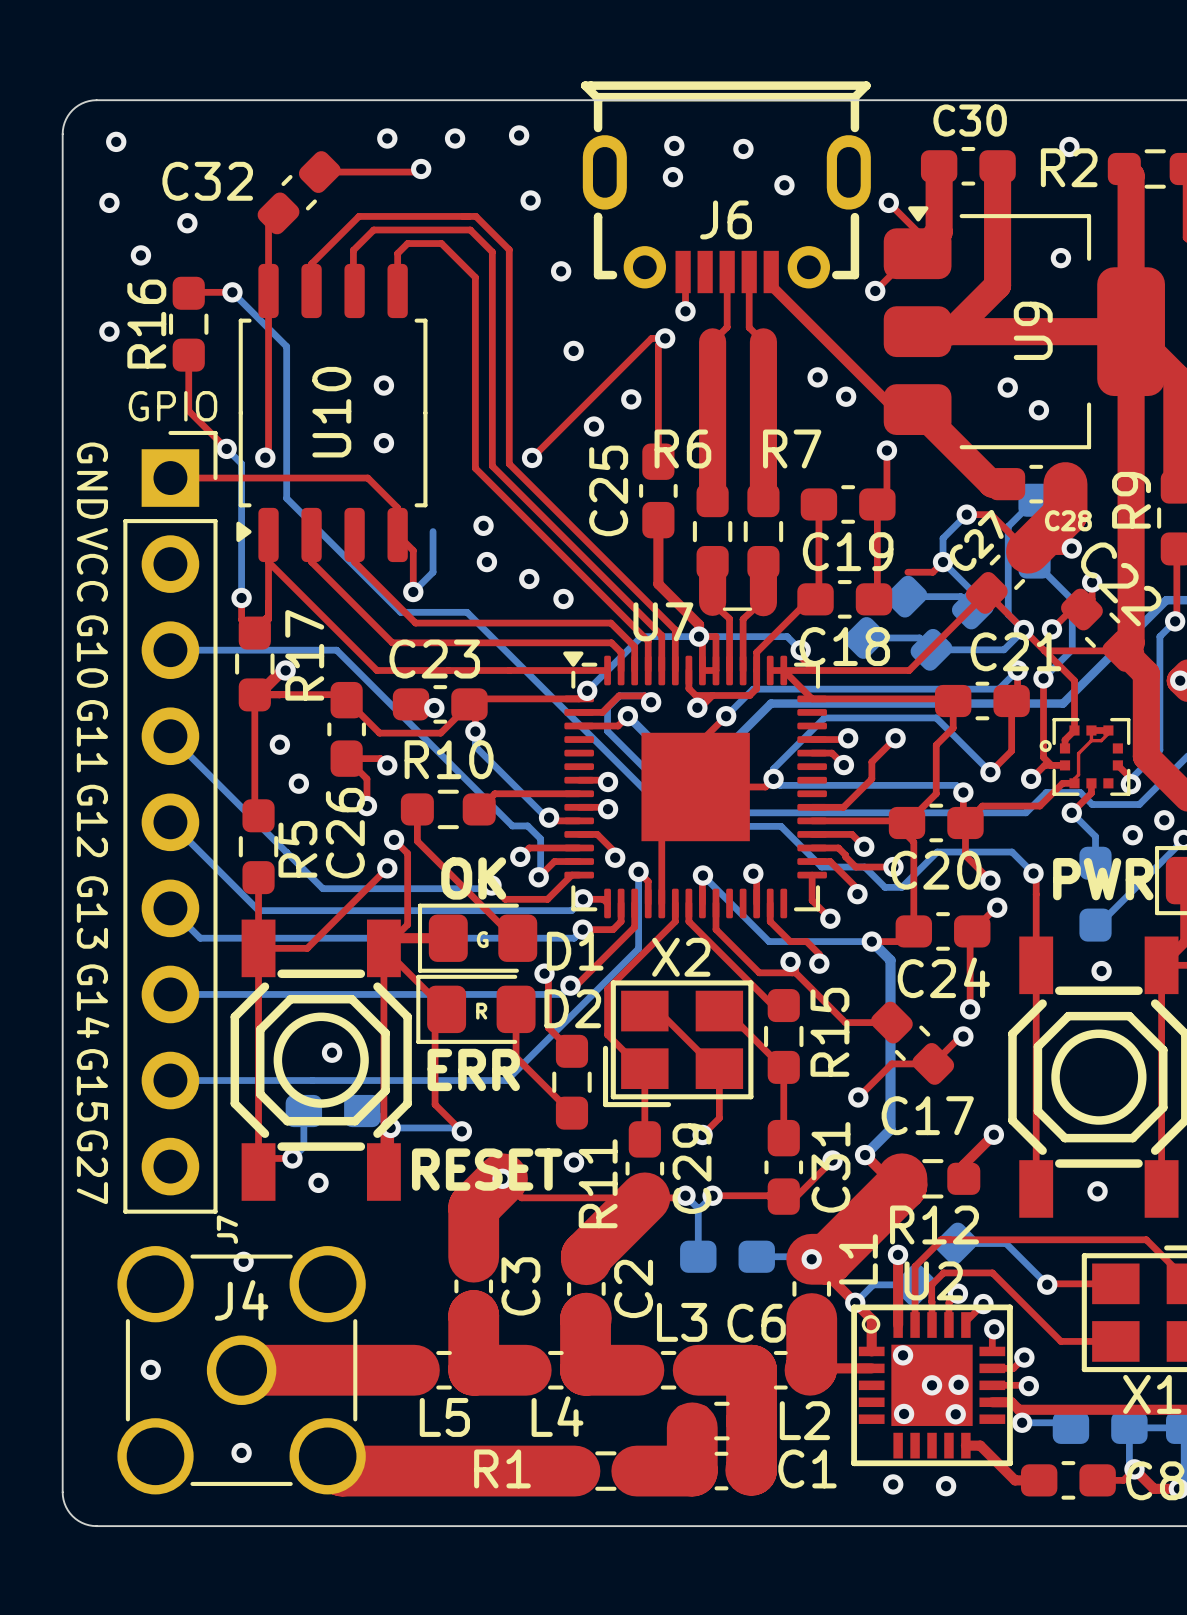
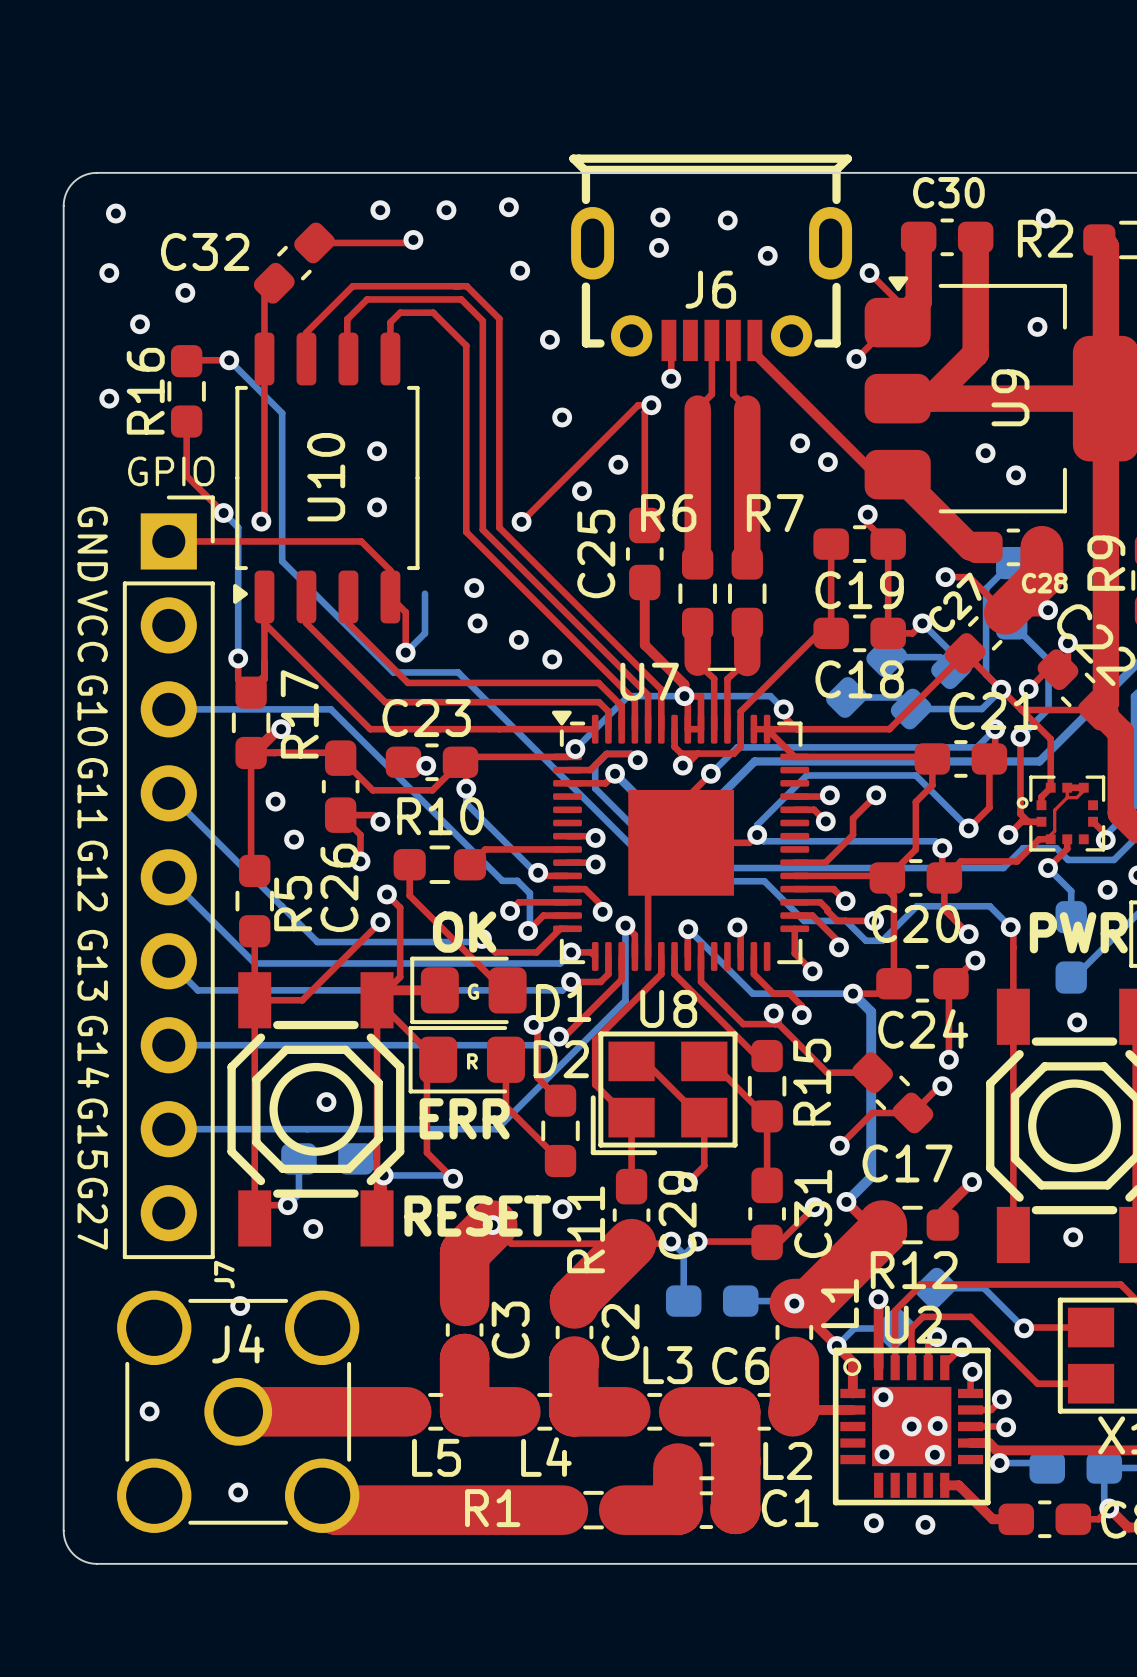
top track: (886, 459) (886, 494) (877, 504) (877, 595) (873, 599) -> (867, 523) (888, 544) (888, 633)
top track: (818, 504) (818, 595) (815, 599) (809, 599) -> (831, 544) (831, 633) (818, 633) (792, 659)
C19 position: (848, 504) -> (859, 544)
bottom track: (966, 514) (943, 538) (943, 562) -> none
C18 position: (844, 599) -> (859, 633)
X2 name: X2 (681, 957) -> U8 (668, 1008)

